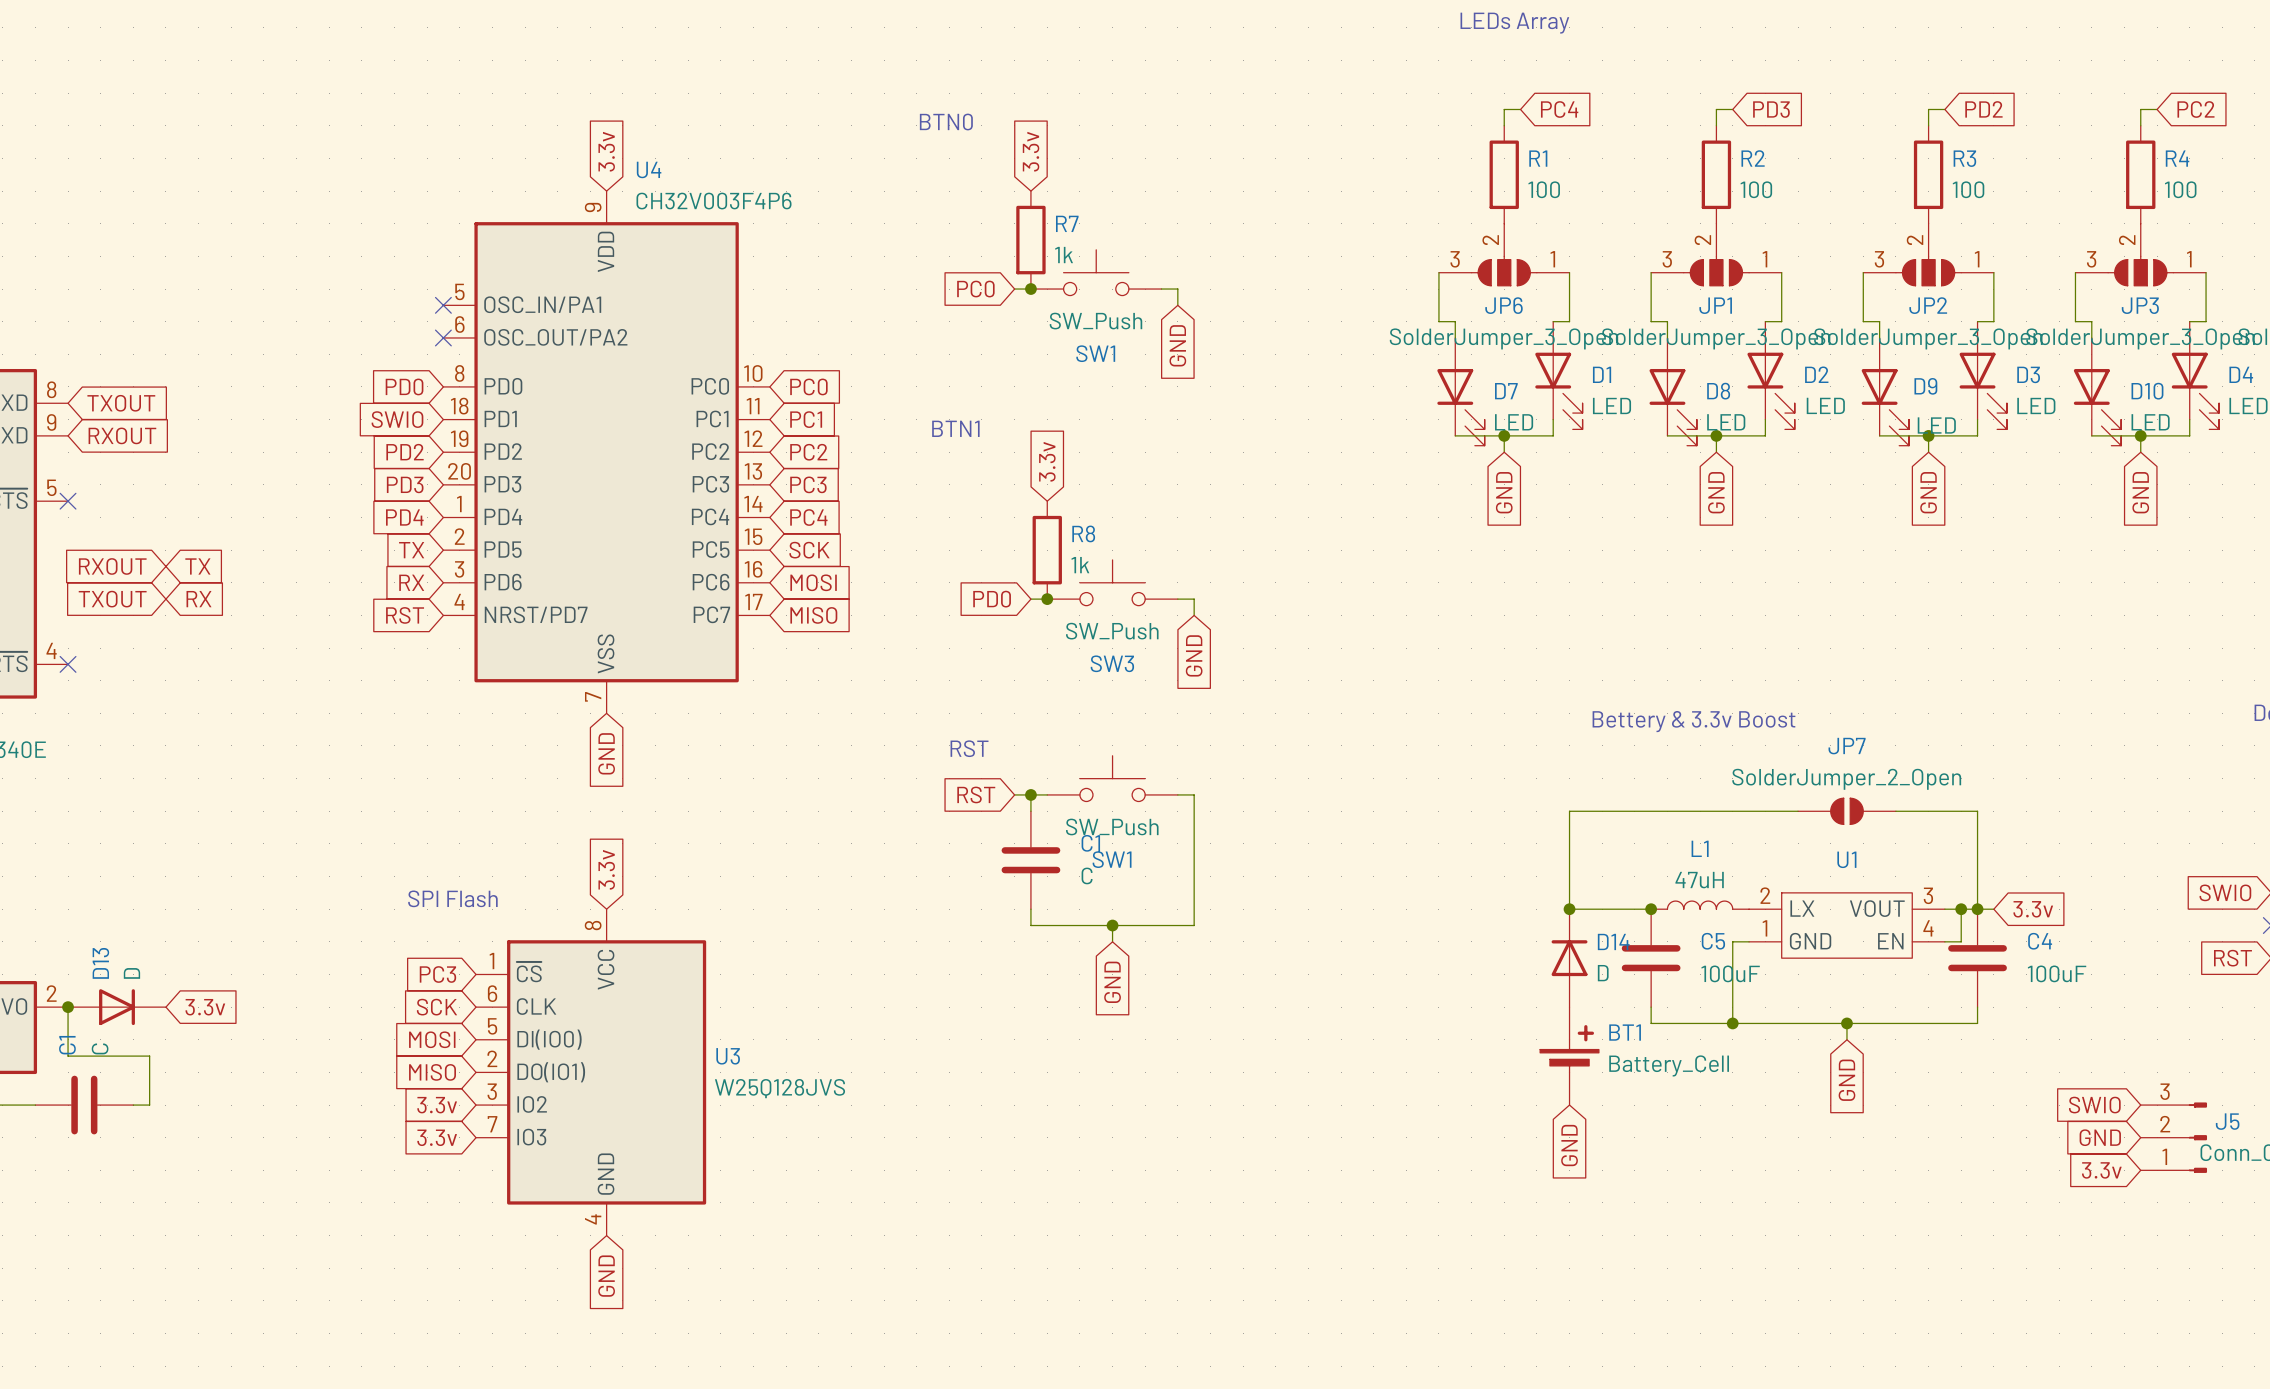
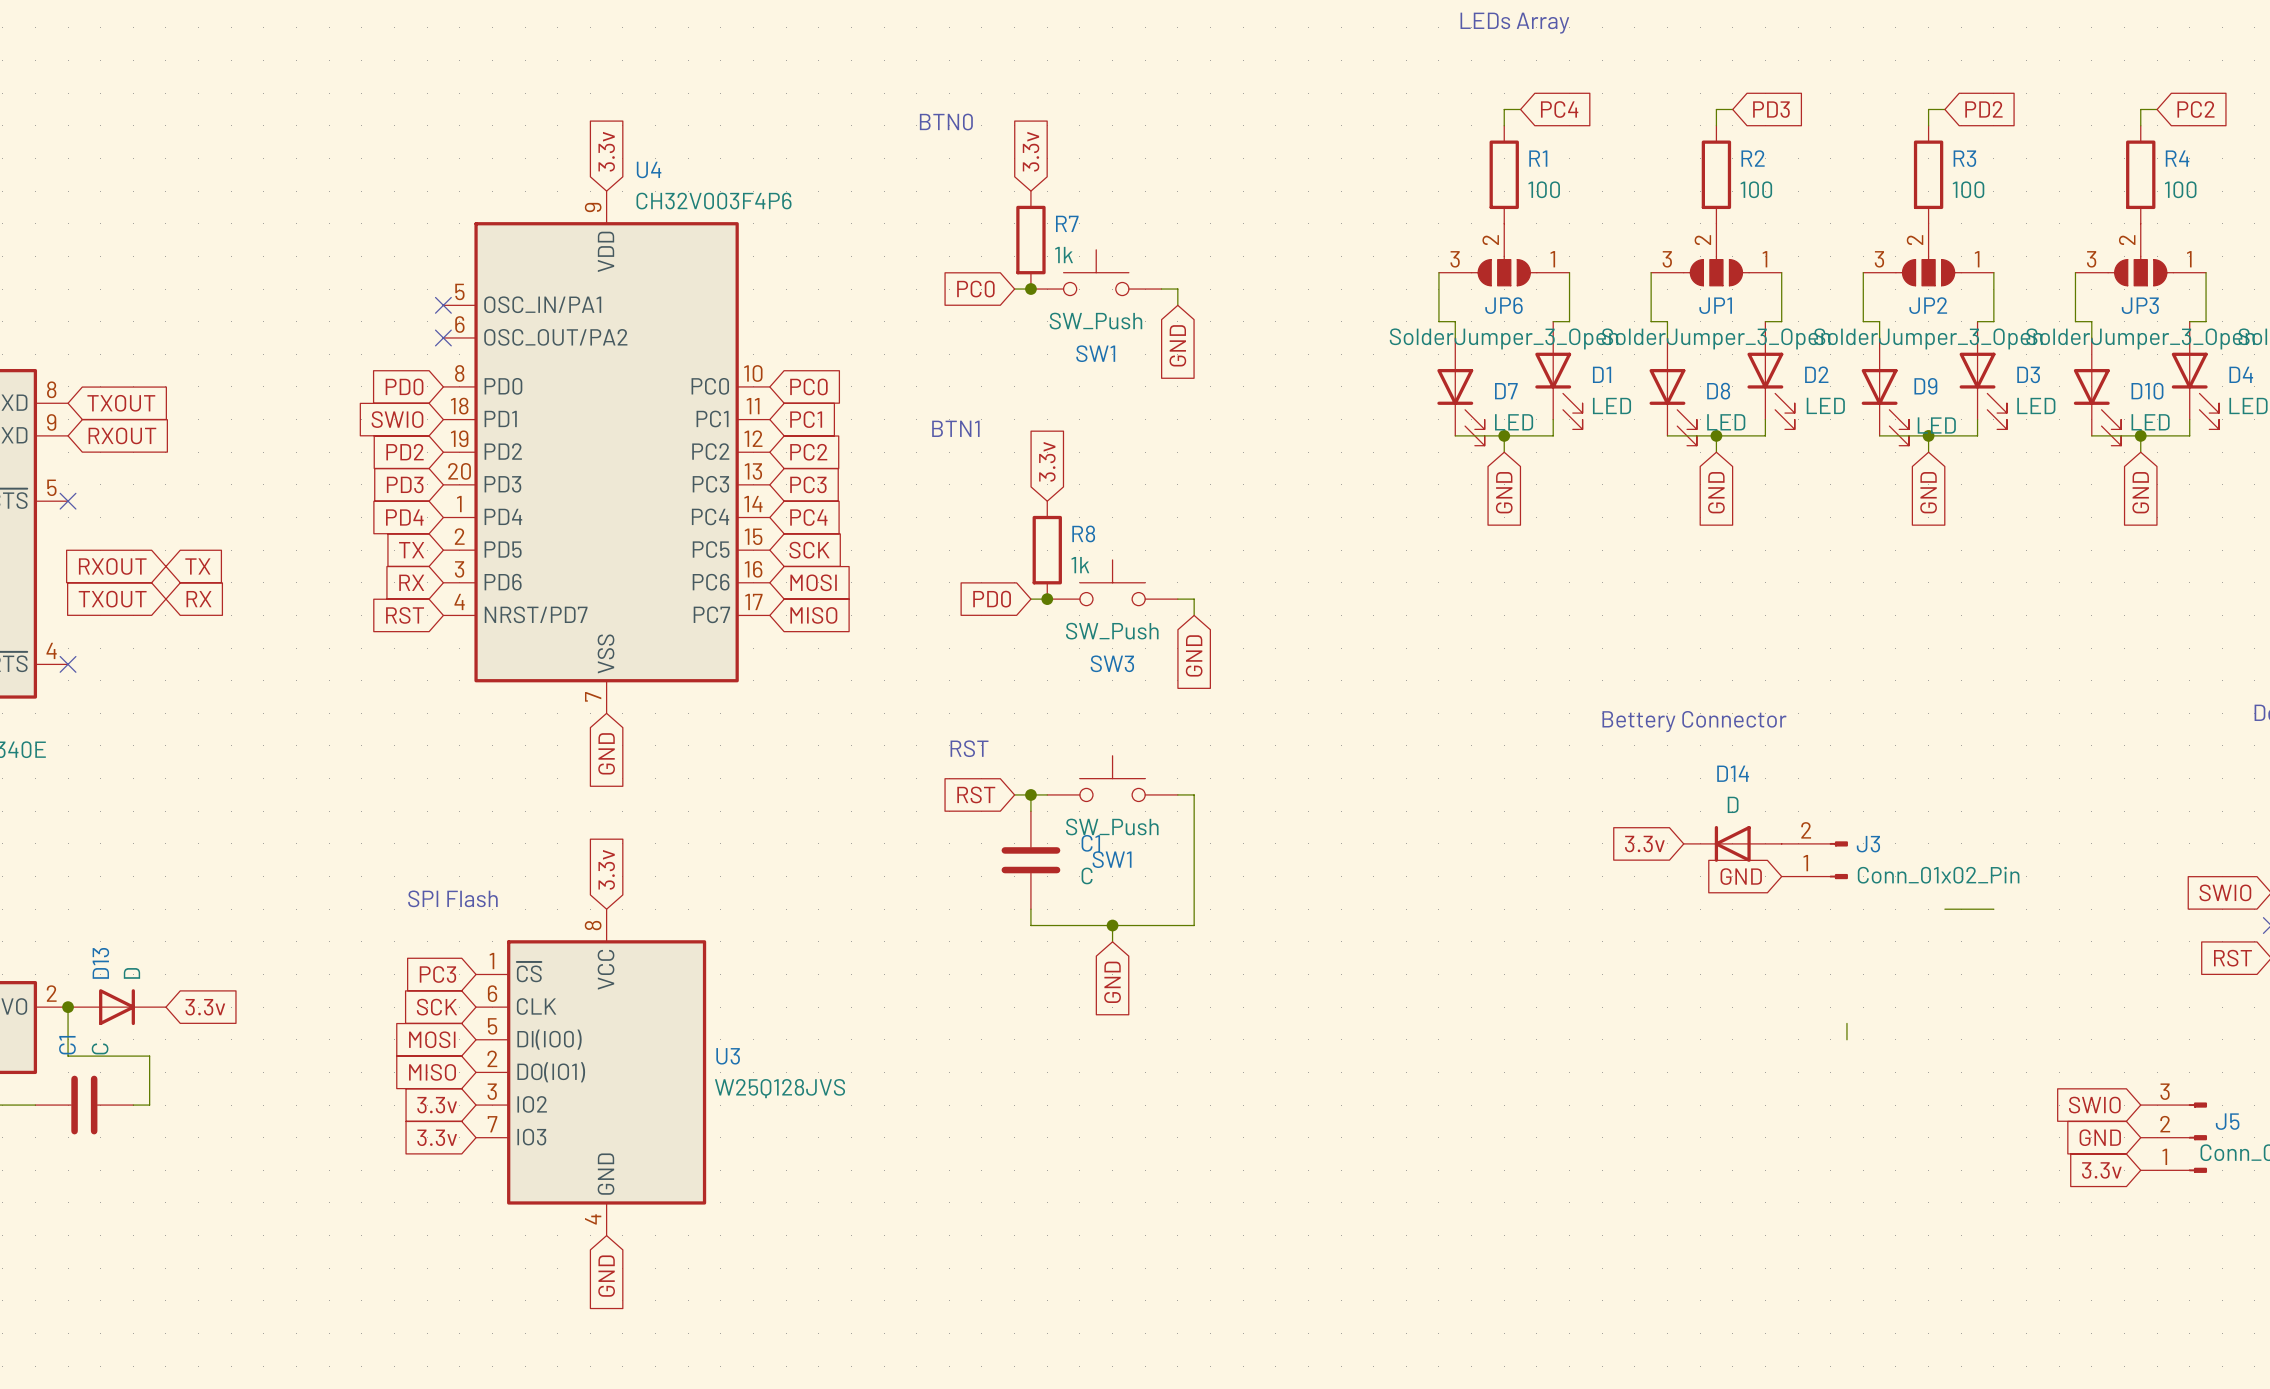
text: Bettery & 3.3v Boost (1694, 721) -> Bettery Connector (1694, 721)
wire: (1798, 811) (1569, 811) (1569, 909) (1651, 909) -> none
JP7: SolderJumper_2_Open (1846, 811) -> none
wire: (1895, 811) (1977, 811) (1977, 909) -> none
J3: none -> Conn_01x02_Pin (1814, 860)
global label: none -> GND (1741, 876)
L1: 47uH (1700, 905) -> none
junction: (1569, 909) -> none
junction: (1651, 909) -> none
wire: (1961, 909) (1961, 941) (1944, 941) -> none
junction: (1961, 909) -> none
junction: (1977, 909) -> none
global label rotation: 0° (2033, 909) -> 180° (1644, 844)
global label position: 3.3v (2033, 909) -> 3.3v (1644, 844)
U1: (1846, 925) -> none
wire: (1749, 941) (1732, 941) (1732, 1023) -> none
D14 rotation: 0° (1569, 958) -> 90° counterclockwise (1732, 843)
D14 position: (1569, 958) -> (1732, 843)
C5: 100uF (1651, 958) -> none
C4: 100uF (1977, 958) -> none
wire: (1651, 1007) (1651, 1023) (1977, 1023) (1977, 1007) -> none
junction: (1732, 1023) -> none
junction: (1846, 1023) -> none
BT1: Battery_Cell (1569, 1056) -> none
global label: GND (1846, 1080) -> none
global label: GND (1569, 1145) -> none

